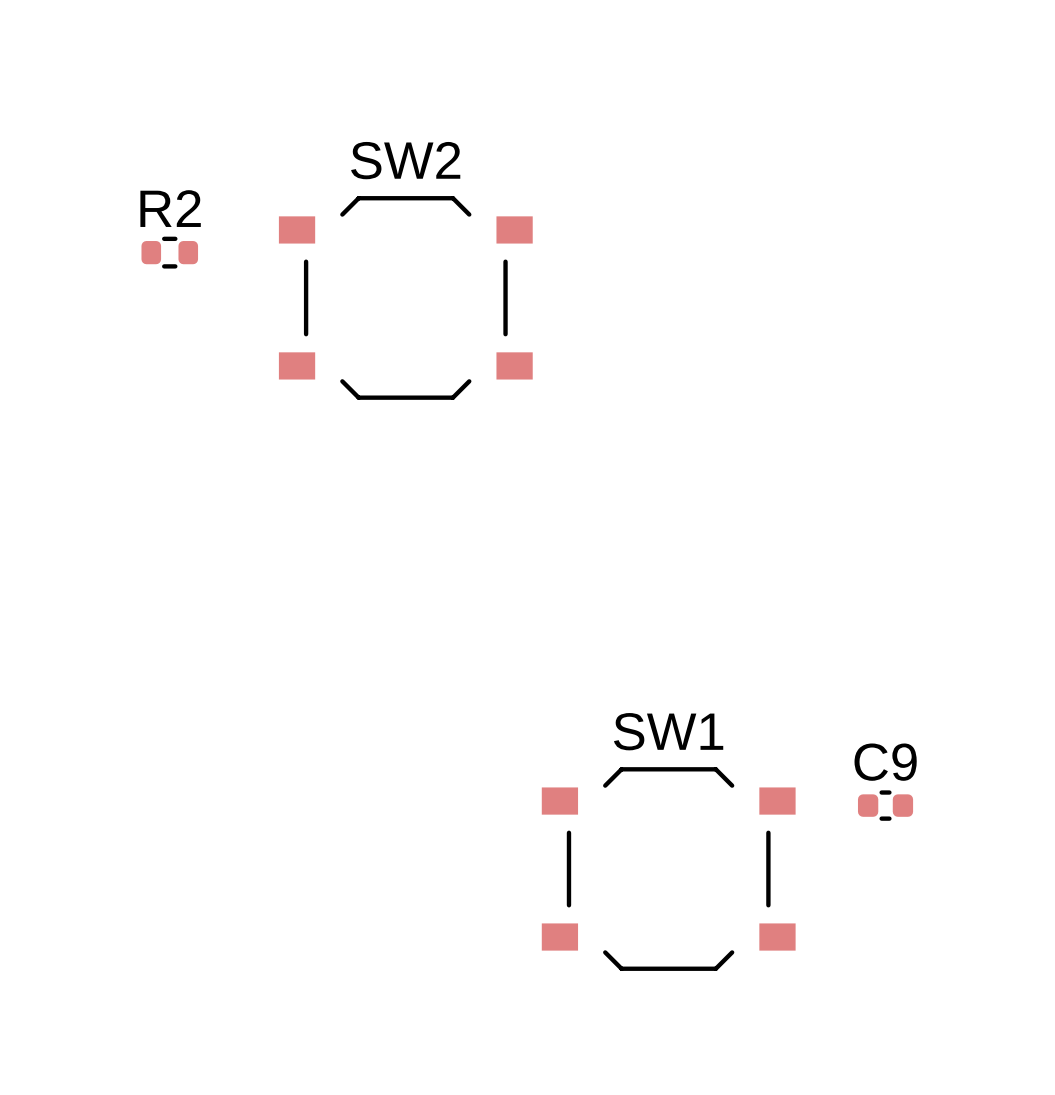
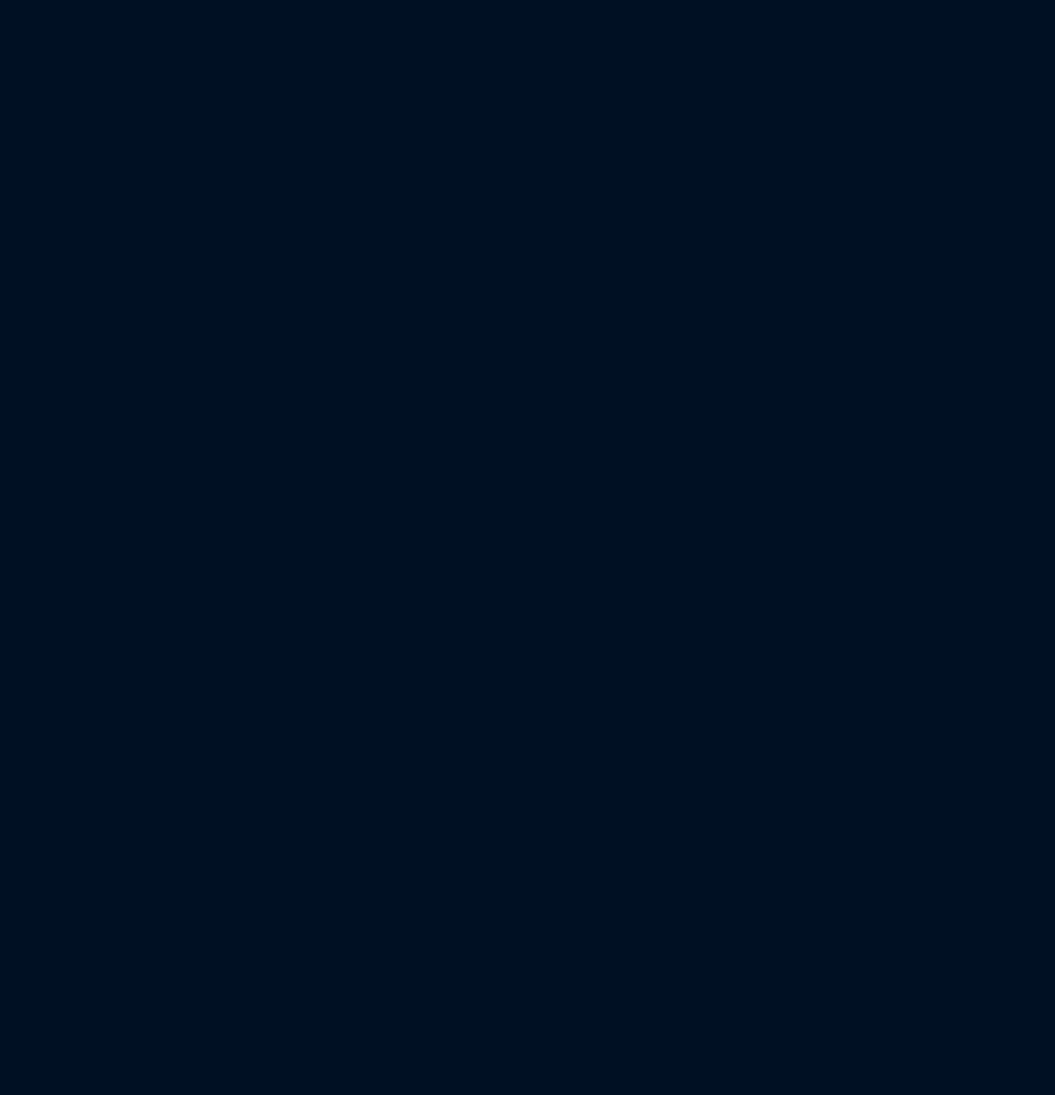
R2: (169, 252) -> none
SW2: (405, 297) -> none
C9: (885, 805) -> none
SW1: (668, 869) -> none

